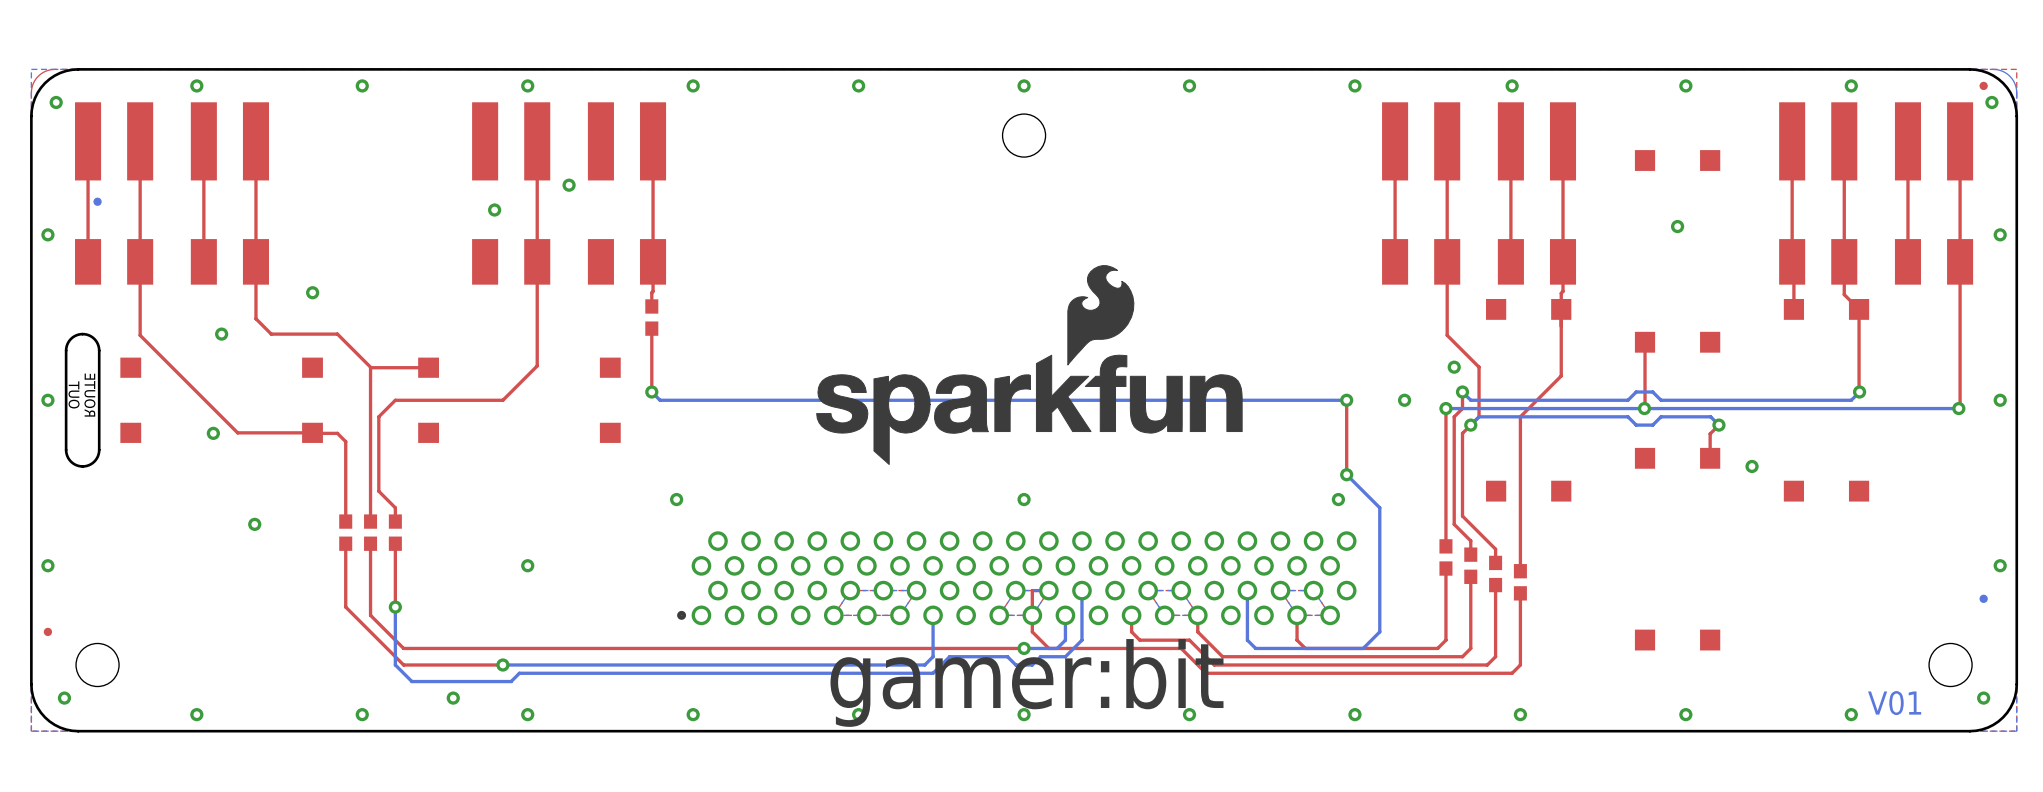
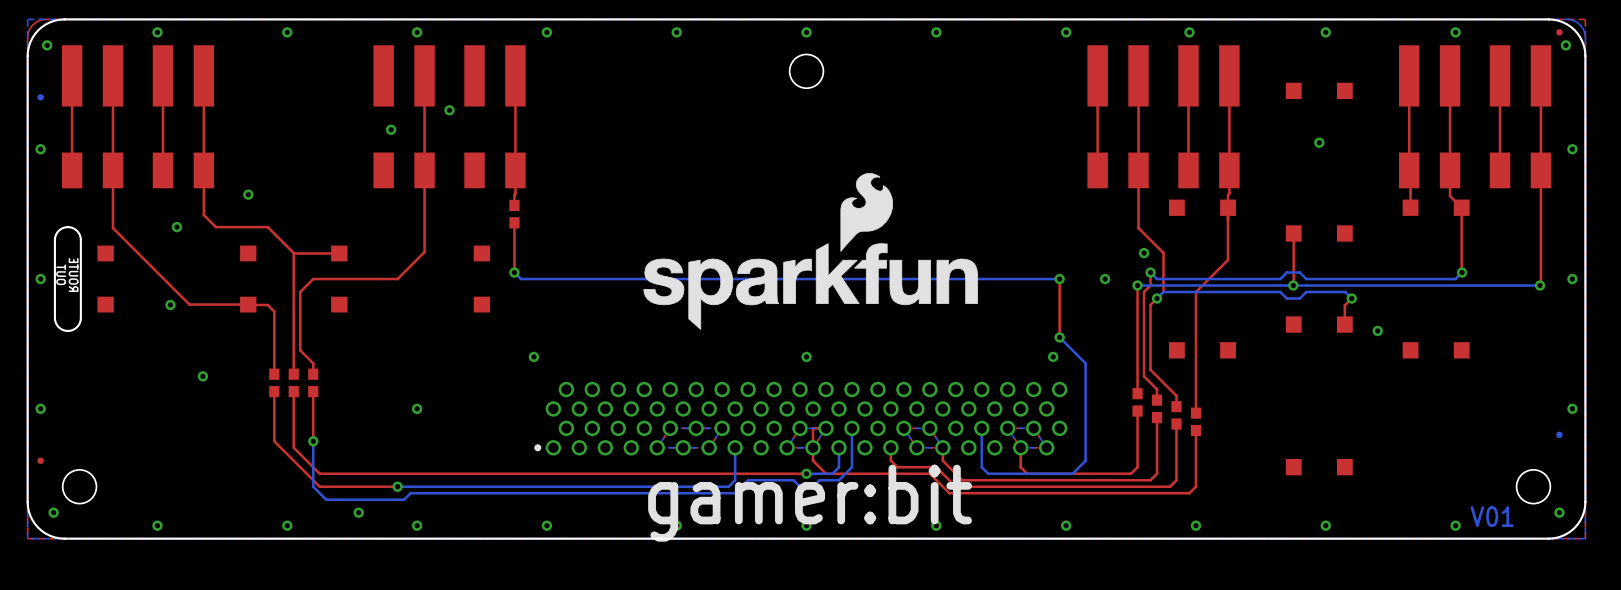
part position: (97, 201) -> (40, 97)

